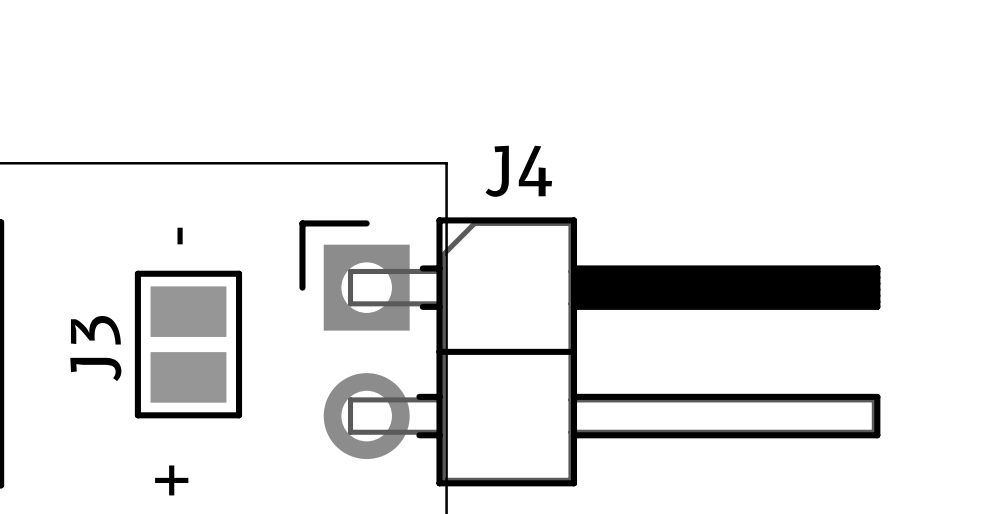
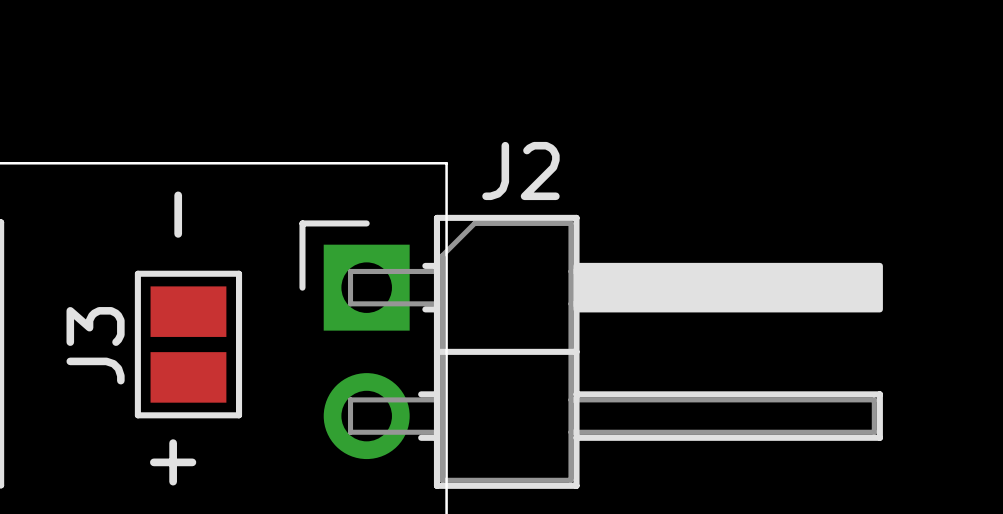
J4: (589, 351) -> none
J2: none -> (591, 351)

